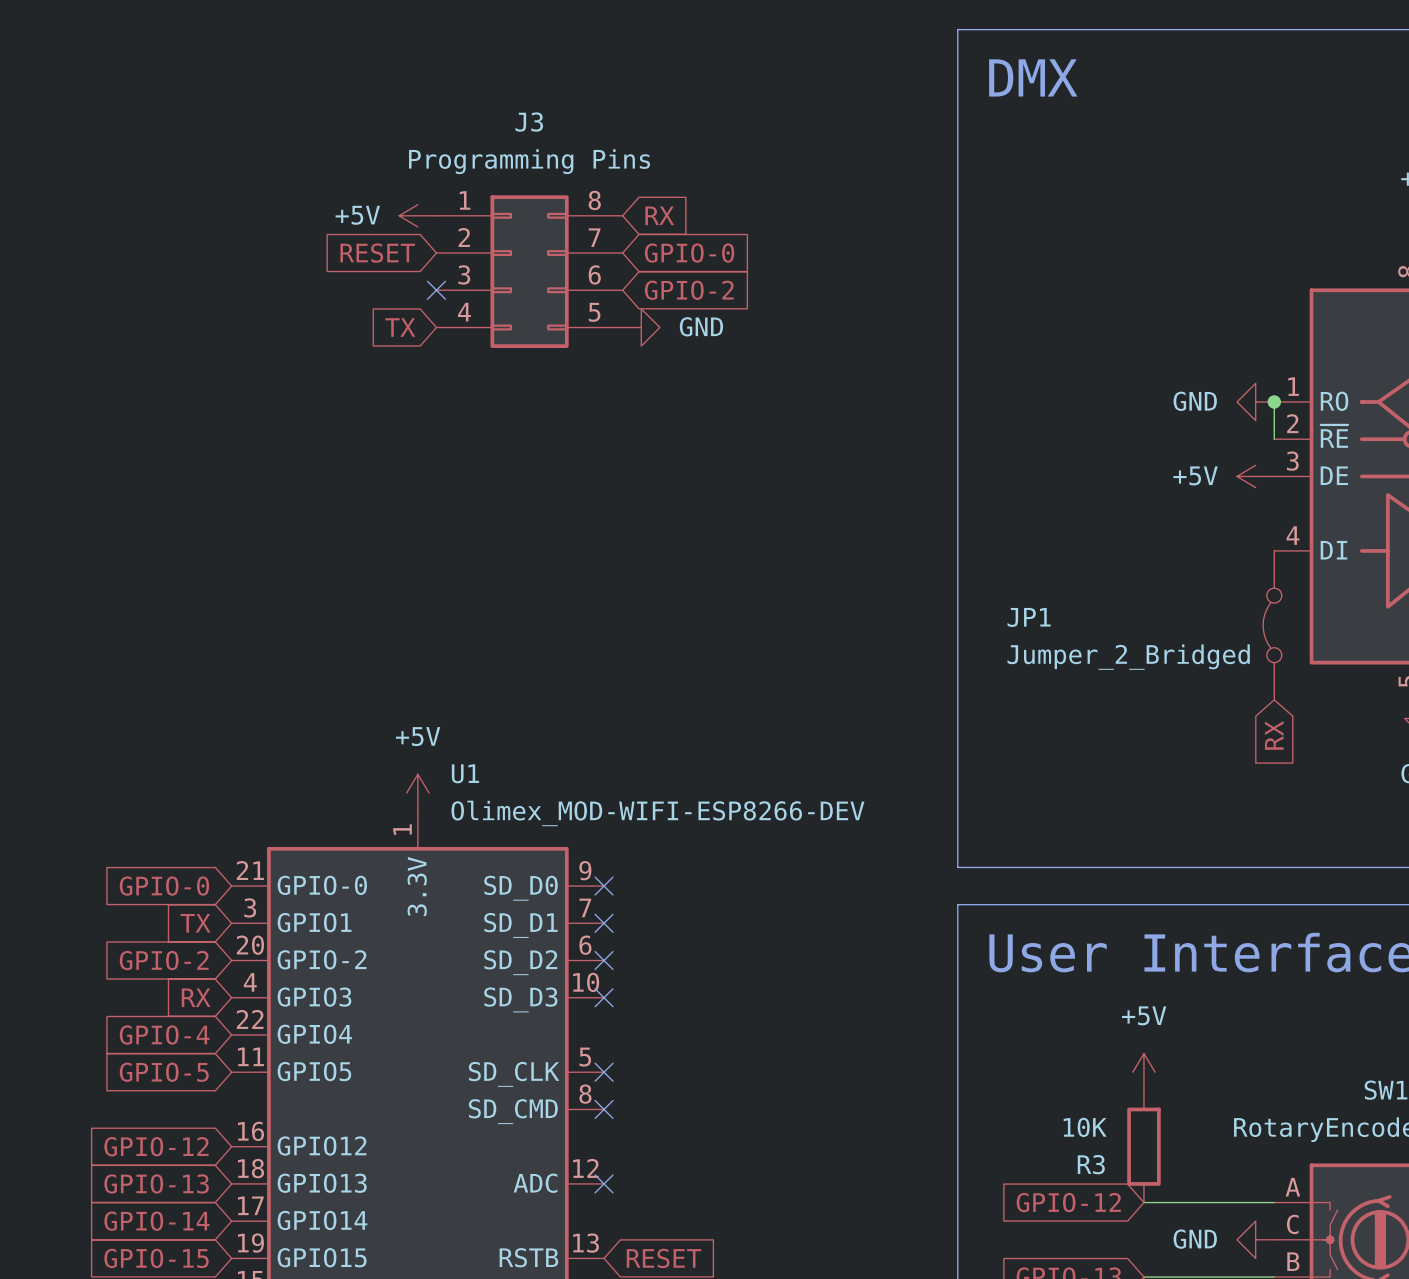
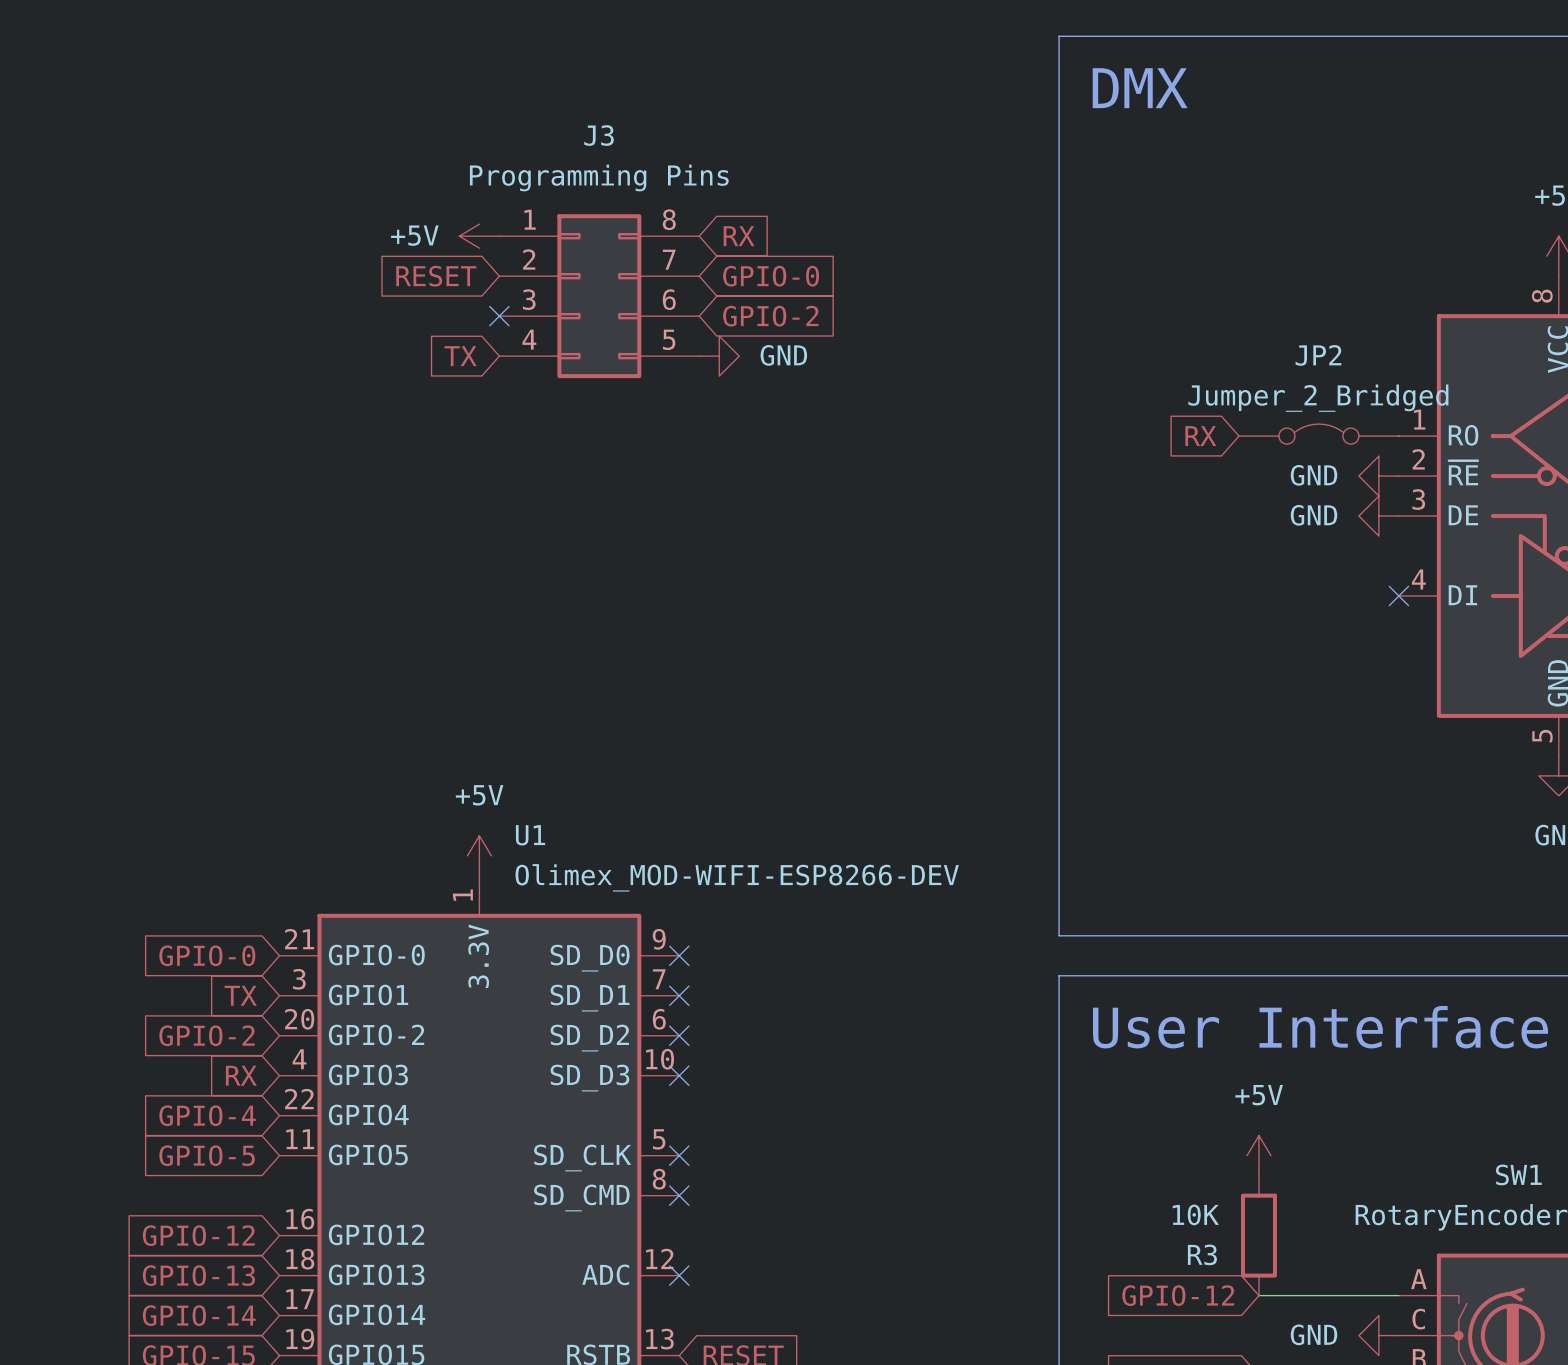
JP2: none -> Jumper_2_Bridged (1318, 434)
power symbol position: GND (1255, 401) -> GND (1378, 476)
wire: (1274, 401) (1274, 439) -> none
junction: (1274, 401) -> none
power symbol: +5V (1255, 476) -> GND (1378, 516)
no-connect mark: none -> (1398, 595)
JP1: Jumper_2_Bridged (1272, 625) -> none
global label rotation: 0° (1274, 735) -> 90° clockwise (1200, 436)
global label position: RX (1274, 735) -> RX (1200, 436)

